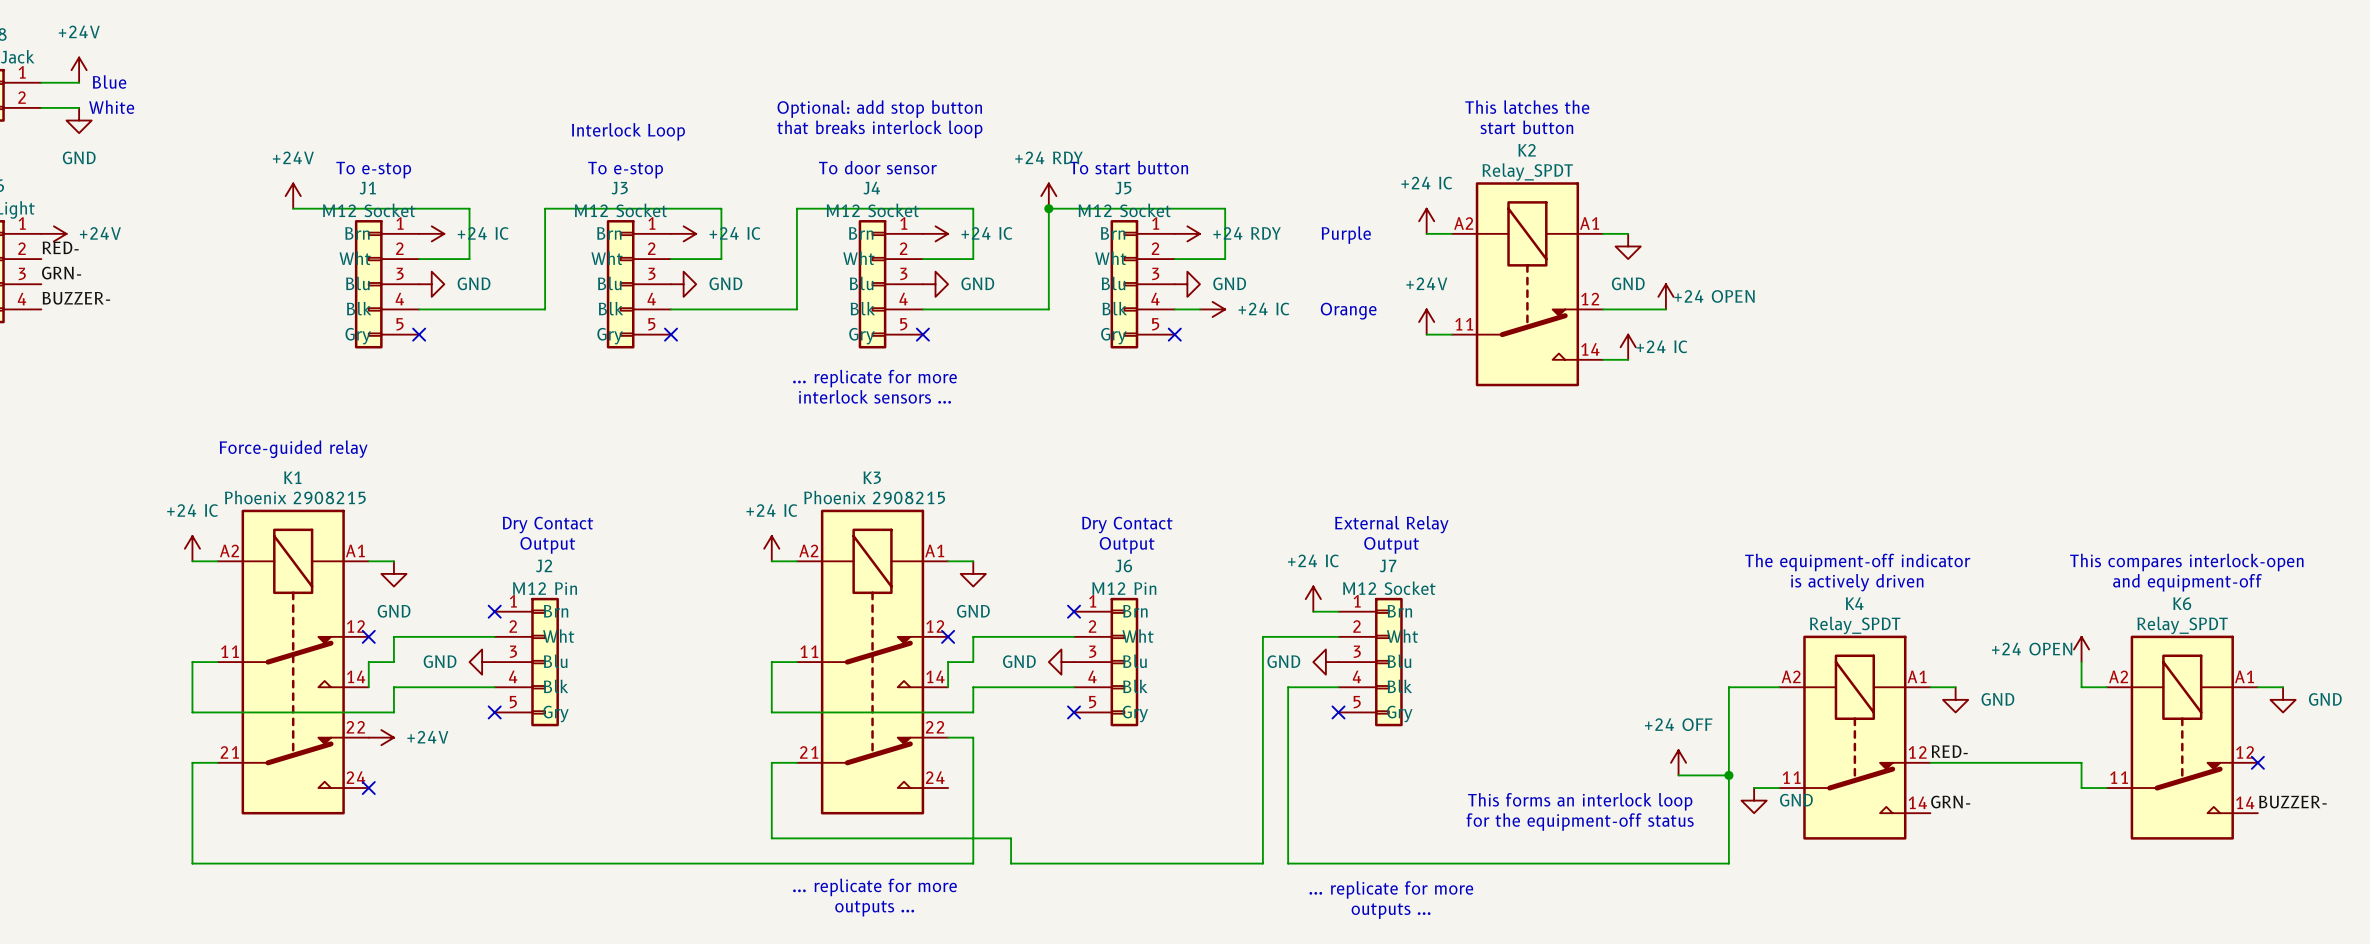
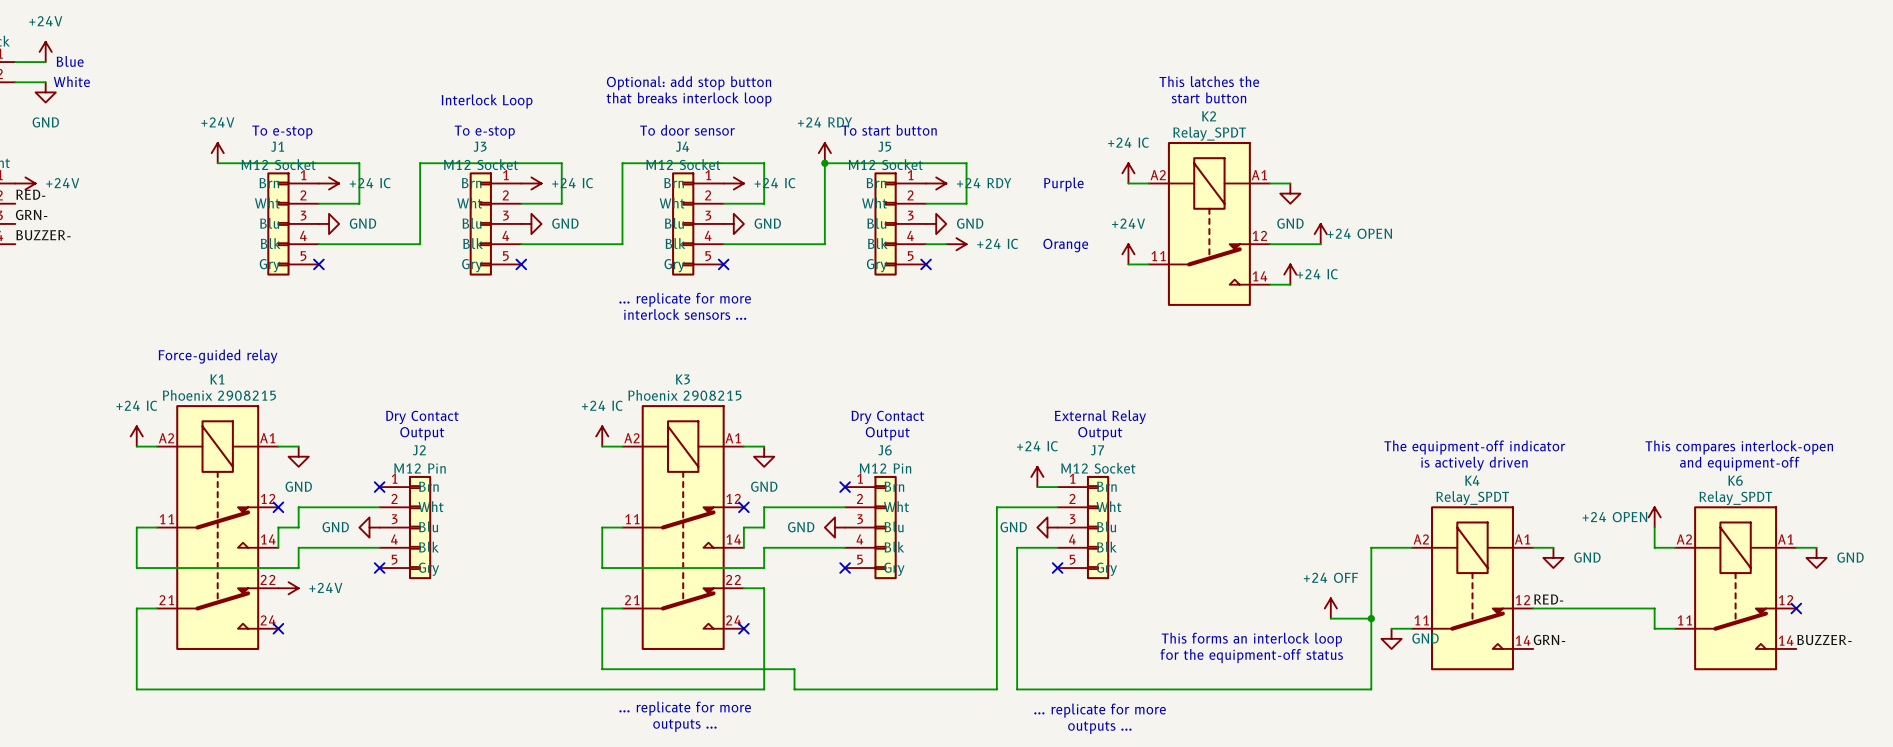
no-connect mark: none -> (743, 628)

